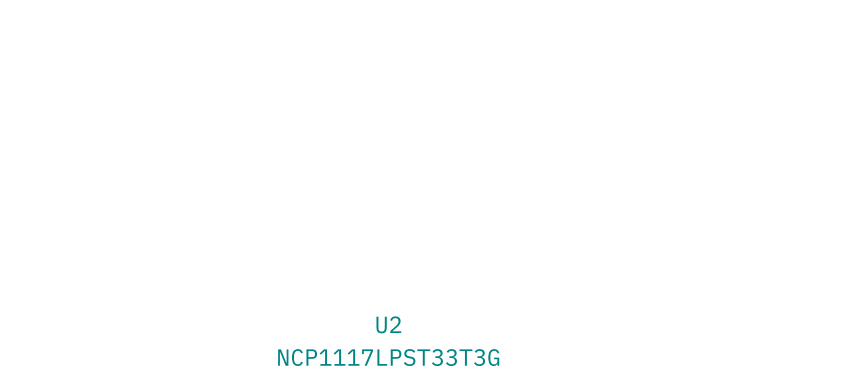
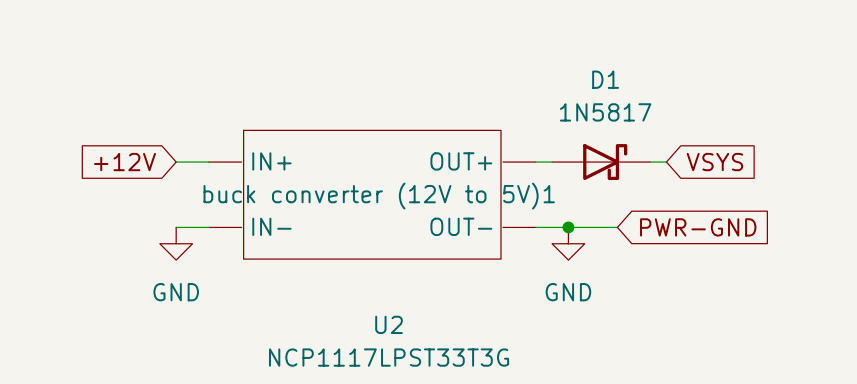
global label: none -> +12V (124, 162)
wire: none -> (176, 162) (208, 162)
wire: none -> (535, 162) (552, 162)
D1: none -> 1N5817 (601, 162)
wire: none -> (650, 162) (666, 162)
global label: none -> VSYS (714, 162)
buck converter (12V to 5V)1: none -> (372, 194)
wire: none -> (176, 227) (208, 227)
wire: none -> (535, 227) (617, 227)
junction: none -> (568, 227)
global label: none -> PWR-GND (698, 227)
power symbol: none -> GND (176, 243)
power symbol: none -> GND (568, 243)

